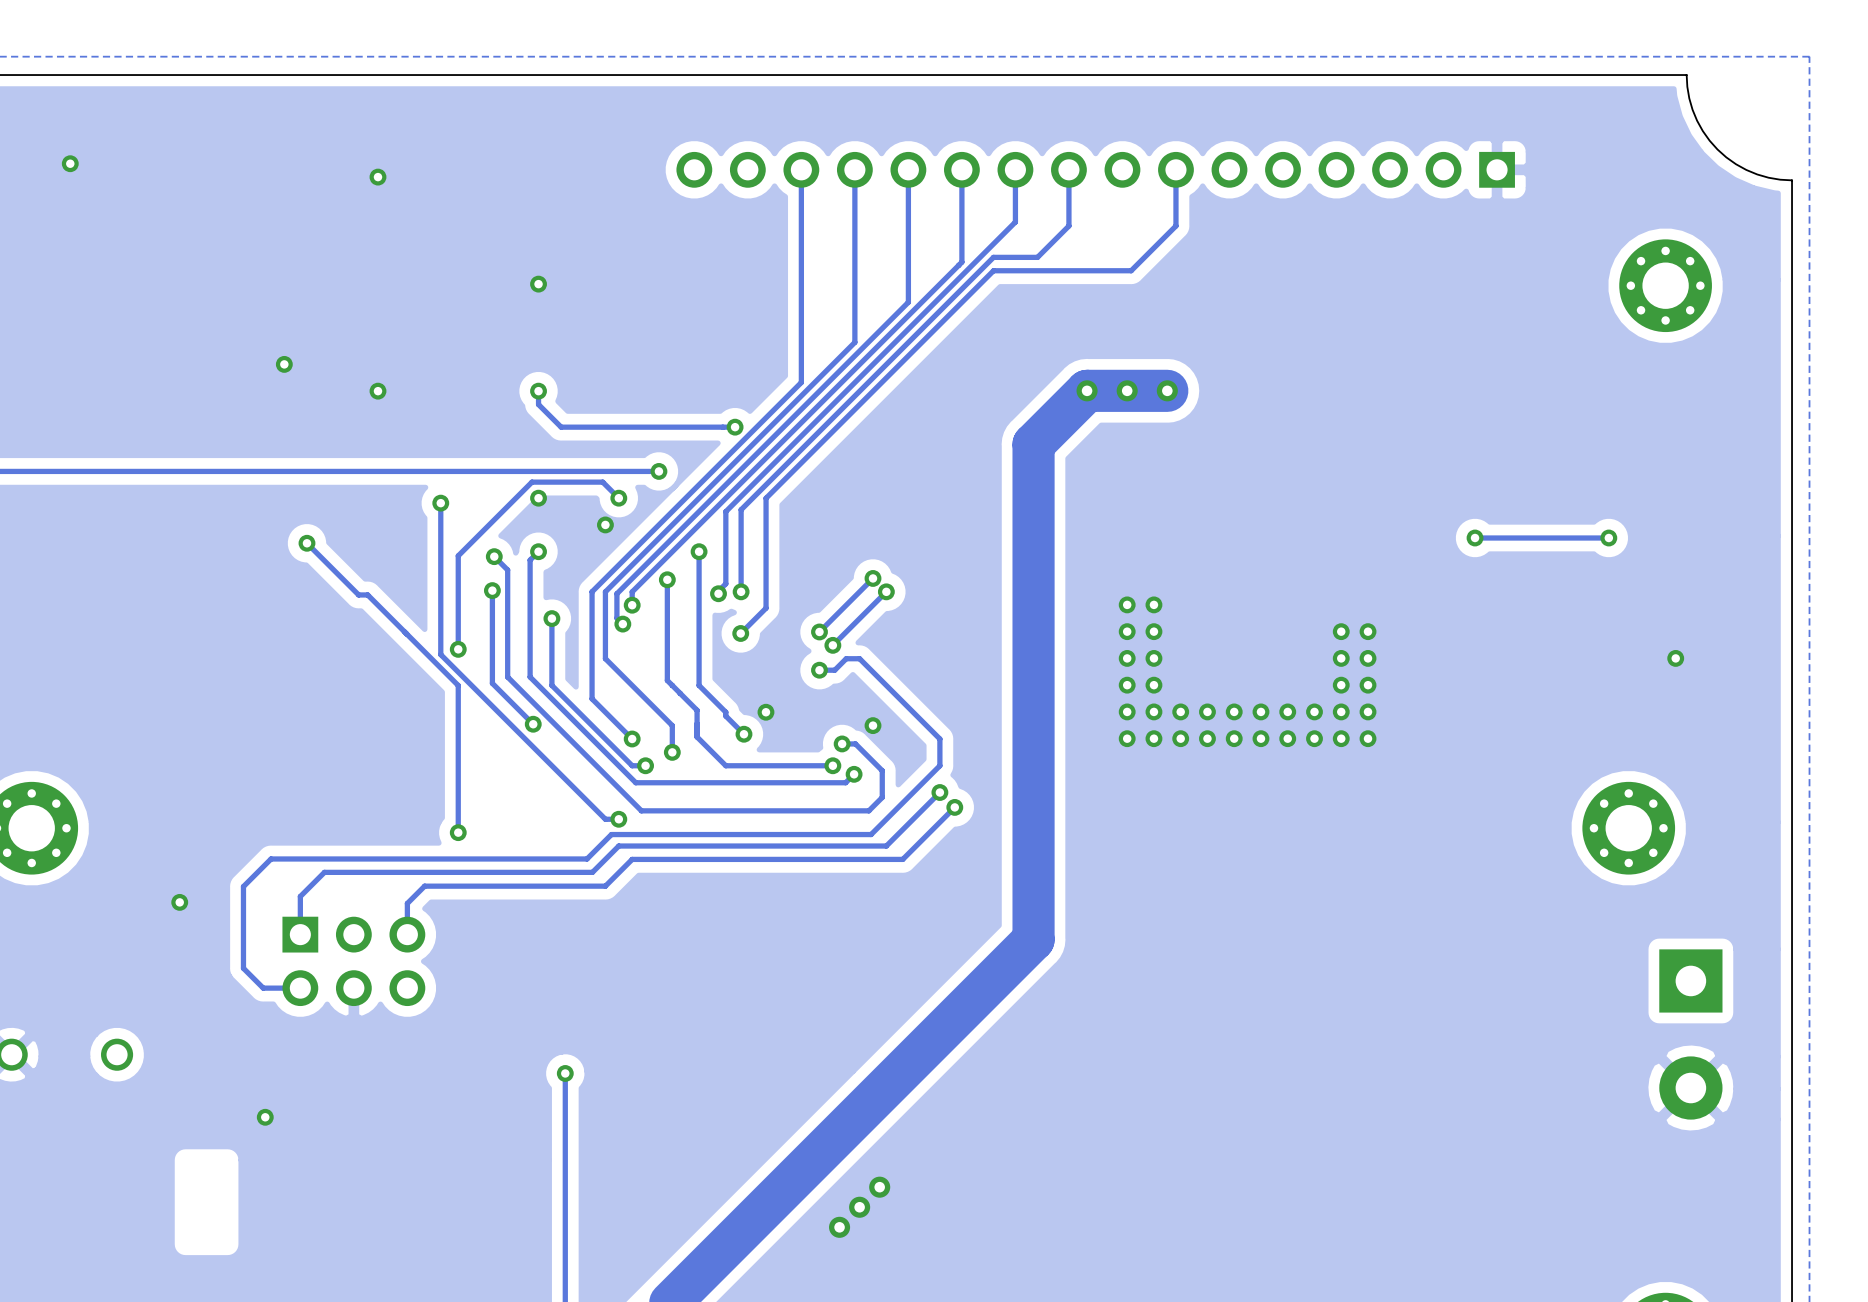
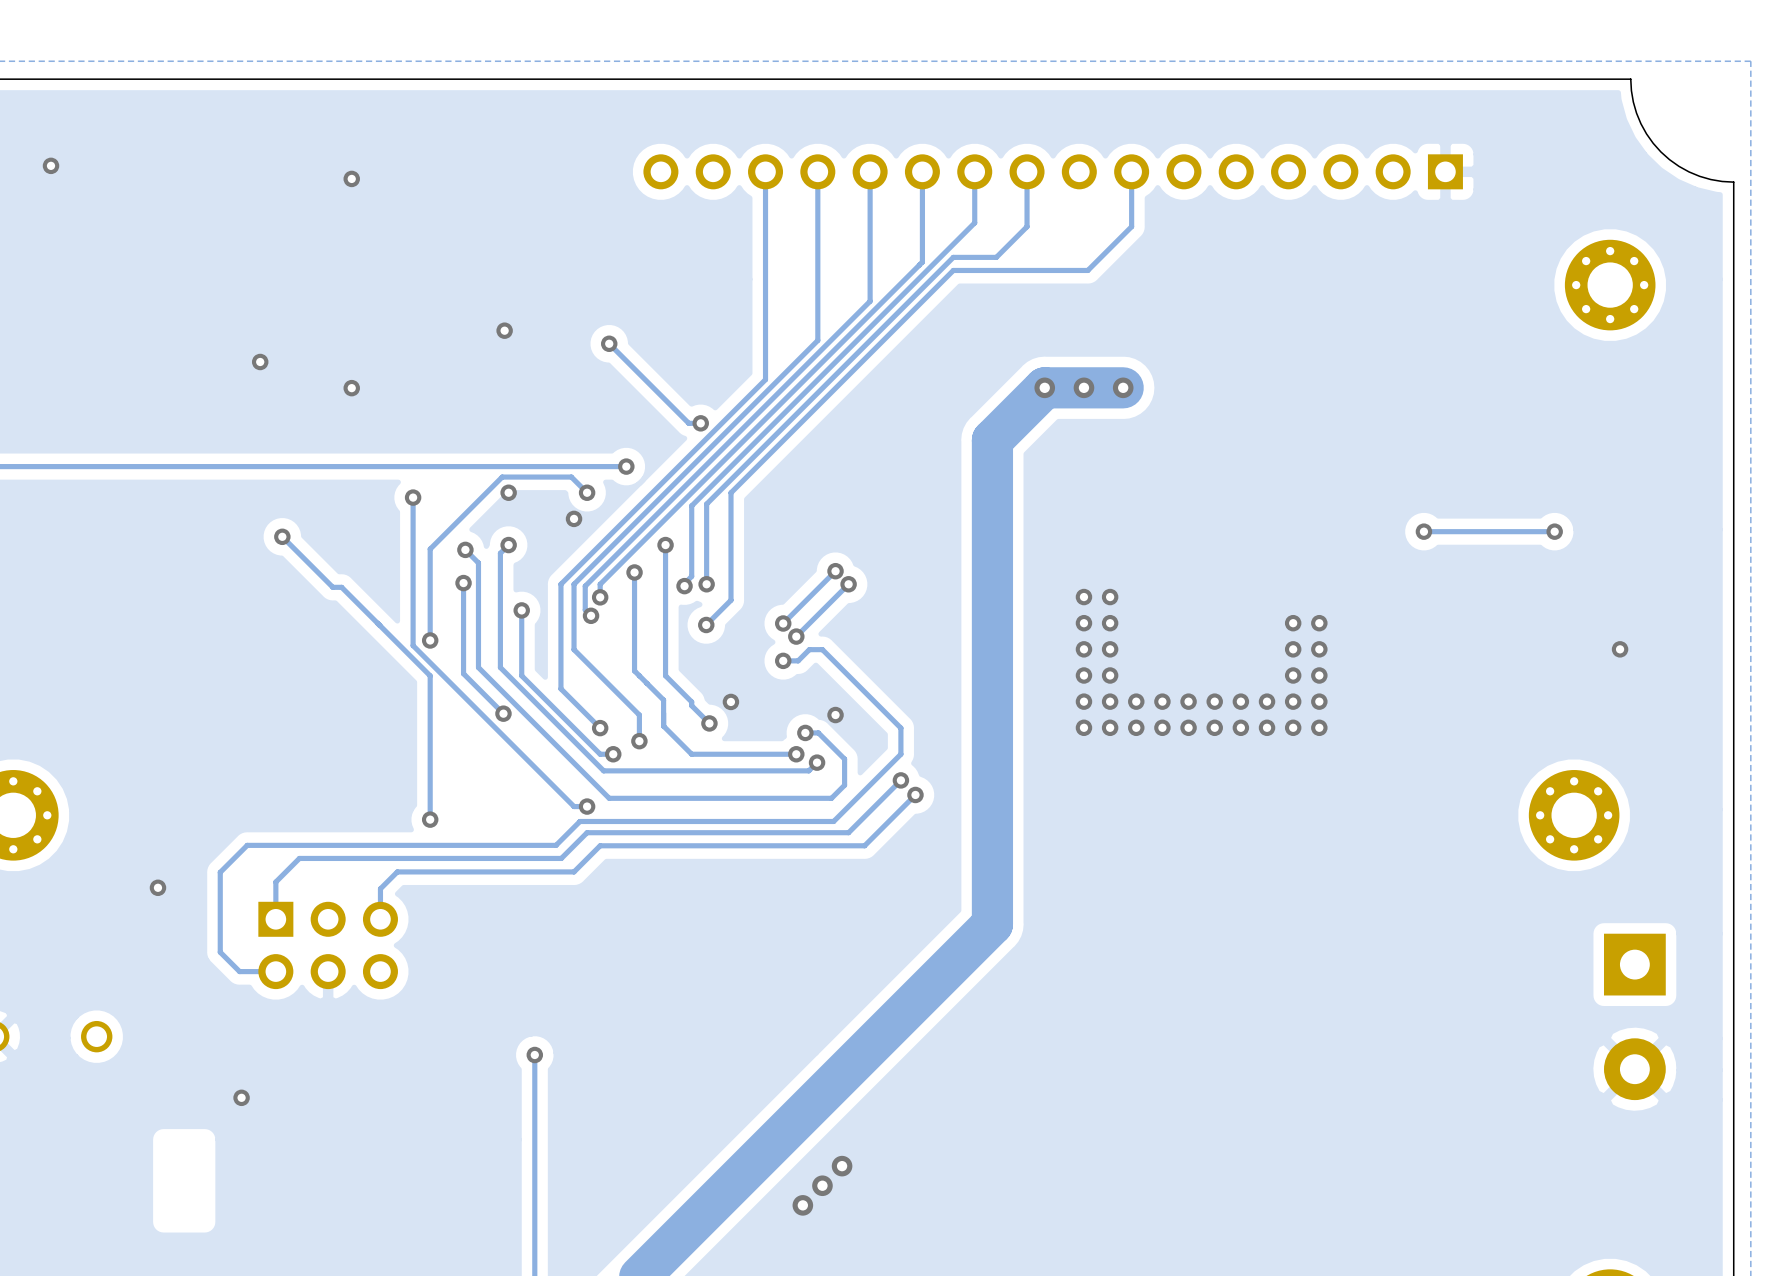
via: (538, 284) -> none
via: none -> (504, 330)
via: none -> (609, 343)
track: (538, 391) (538, 404) (561, 427) (722, 427) -> (609, 343) (688, 423)
via: (538, 391) -> none

